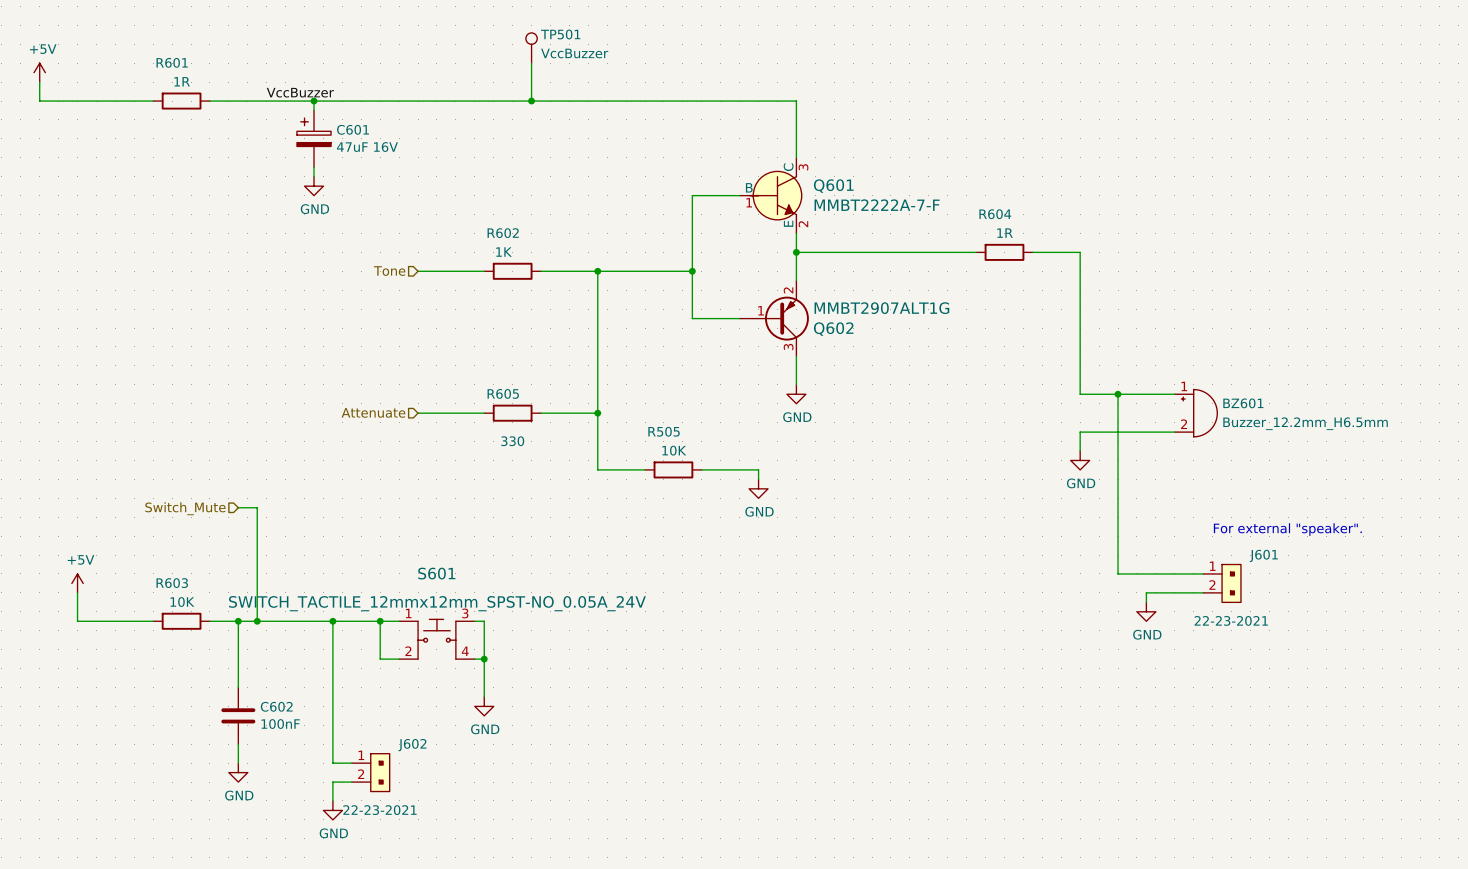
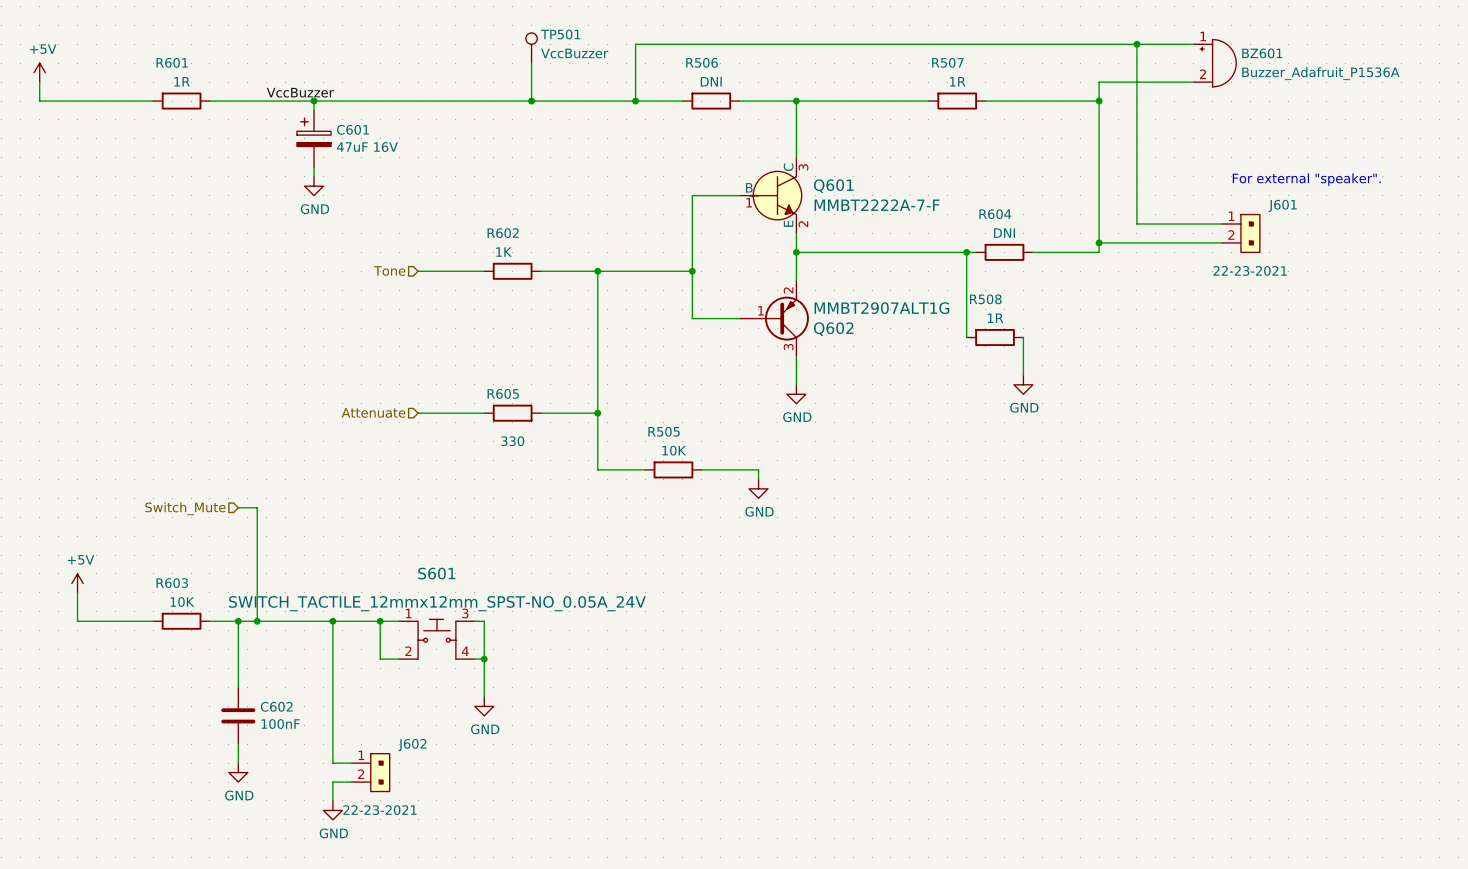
wire: none -> (1136, 44) (1136, 224) (1222, 224)
junction: none -> (1136, 44)
wire: none -> (1193, 44) (635, 44) (635, 101)
junction: none -> (635, 101)
wire: (682, 101) (739, 101) -> none
R506: none -> DNI (711, 101)
wire: none -> (796, 101) (928, 101)
junction: none -> (796, 101)
R507: none -> 1R (957, 101)
wire: none -> (985, 101) (1099, 101)
junction: none -> (1099, 101)
text: none -> For external "speaker". (1306, 179)
R604 value: 1R (1005, 233) -> DNI (1004, 233)
wire: none -> (1099, 242) (1222, 242)
junction: none -> (1099, 242)
wire: none -> (966, 252) (966, 337)
junction: none -> (966, 252)
wire: (1080, 252) (1080, 394) (1174, 394) -> (1080, 252) (1099, 252) (1099, 82) (1193, 82)
R508: none -> 1R (995, 337)
wire: none -> (1023, 337) (1023, 375)
wire: (1118, 394) (1118, 573) (1203, 573) -> none
junction: (1118, 394) -> none
BZ601 position: (1196, 413) -> (1214, 63)
BZ601 value: Buzzer_12.2mm_H6.5mm (1305, 423) -> Buzzer_Adafruit_P1536A (1320, 73)
wire: (1174, 432) (1080, 432) (1080, 451) -> none
power symbol position: GND (1080, 460) -> GND (1023, 384)
text: For external "speaker". (1287, 529) -> none
J601 position: (1222, 583) -> (1240, 233)
wire: (1203, 592) (1146, 592) (1146, 602) -> none
power symbol: GND (1146, 611) -> none

